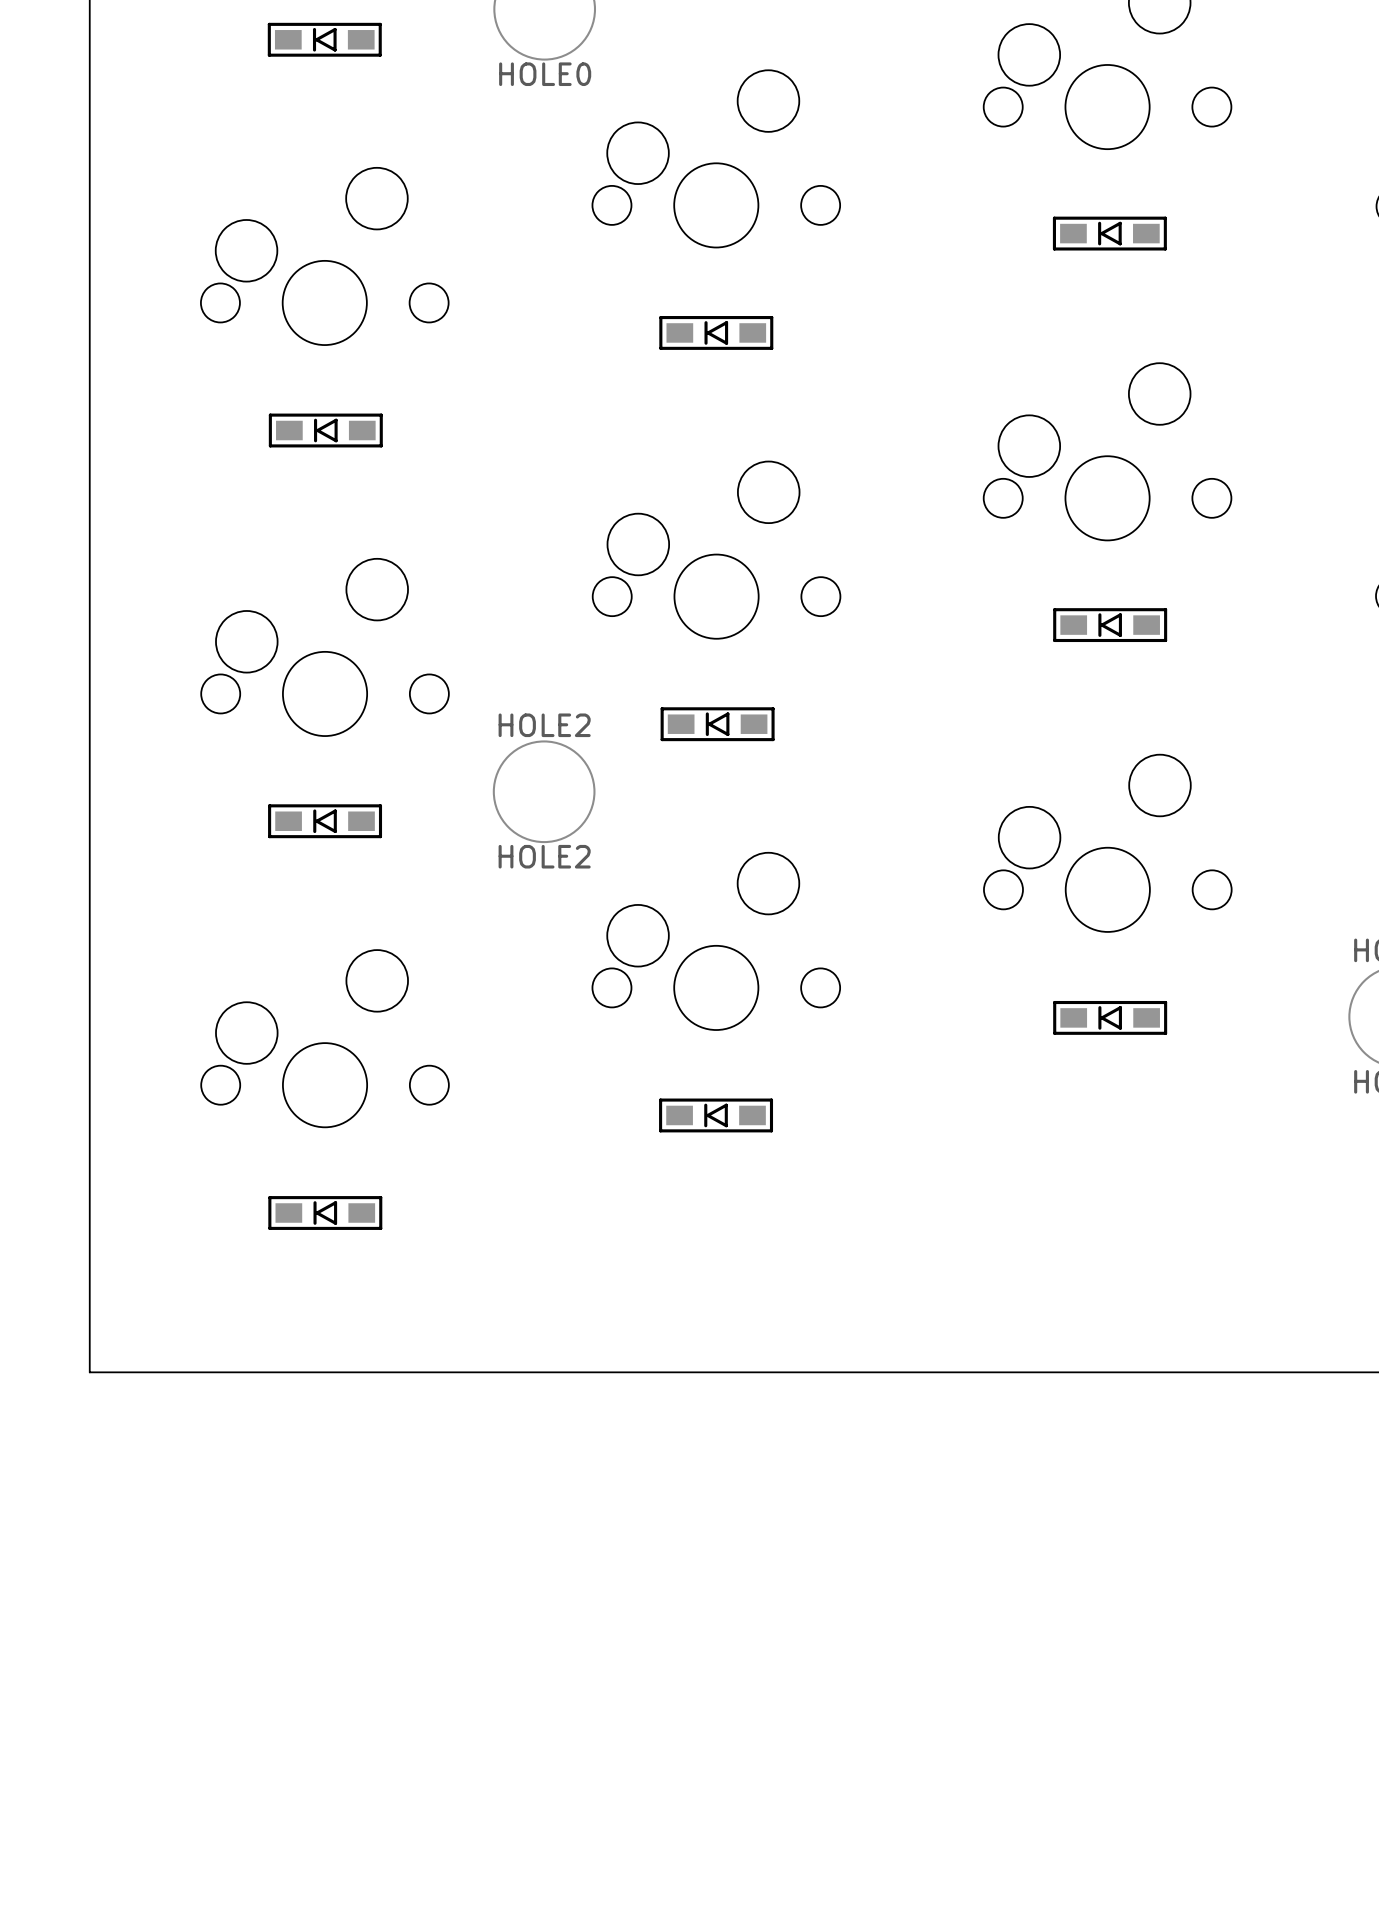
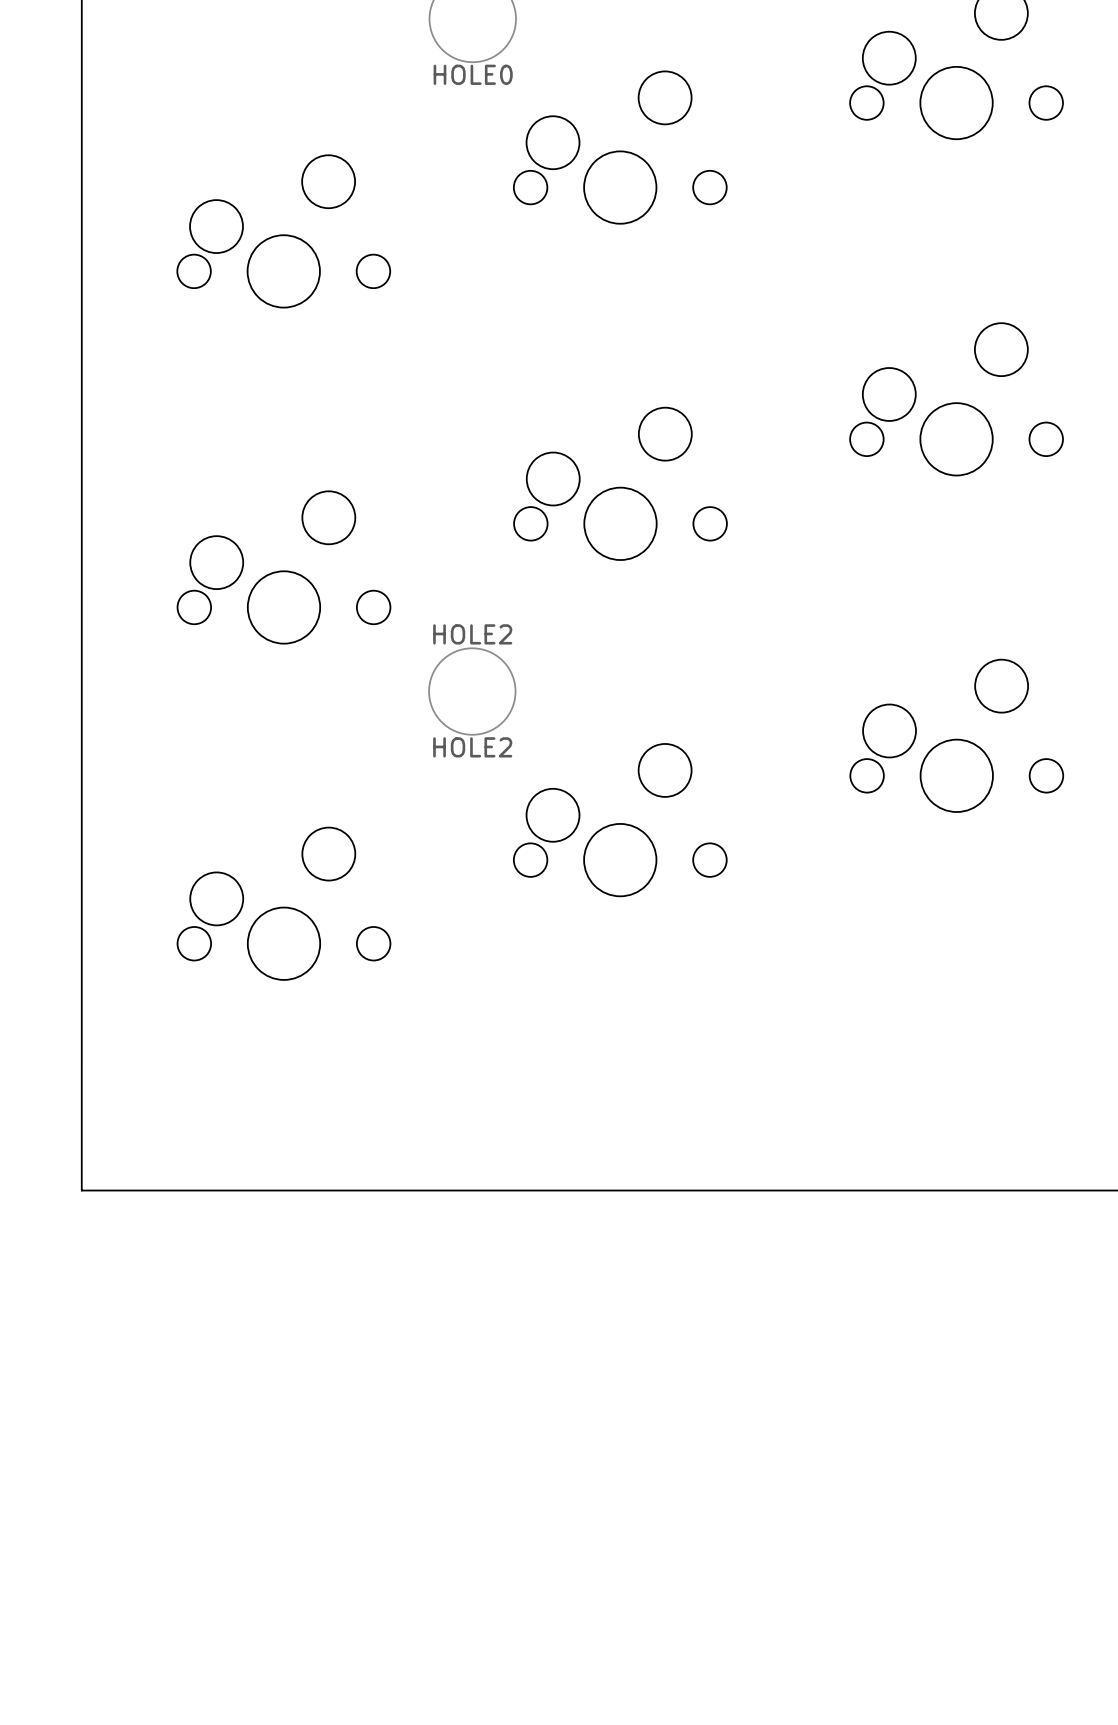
part: (324, 39) -> none
part: (1109, 233) -> none
part: (716, 332) -> none
part: (325, 430) -> none
part: (1110, 625) -> none
part: (717, 724) -> none
part: (325, 821) -> none
part: (1110, 1017) -> none
part: (716, 1115) -> none
part: (325, 1213) -> none

